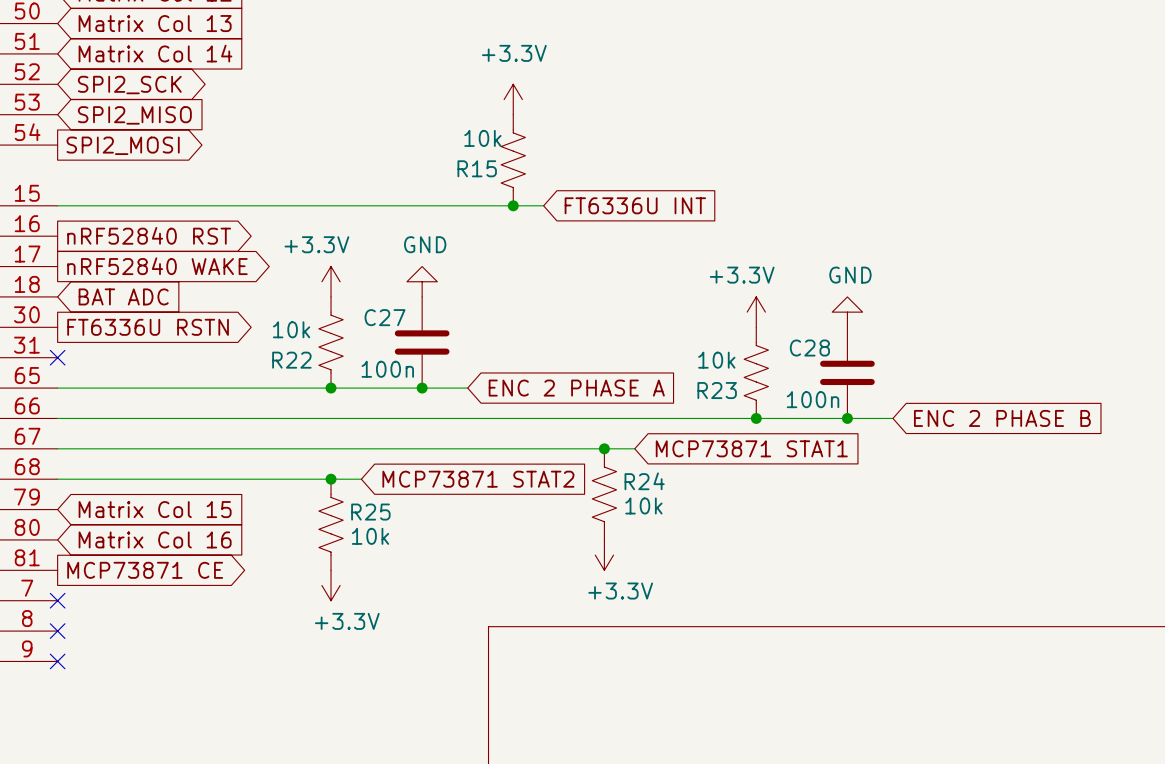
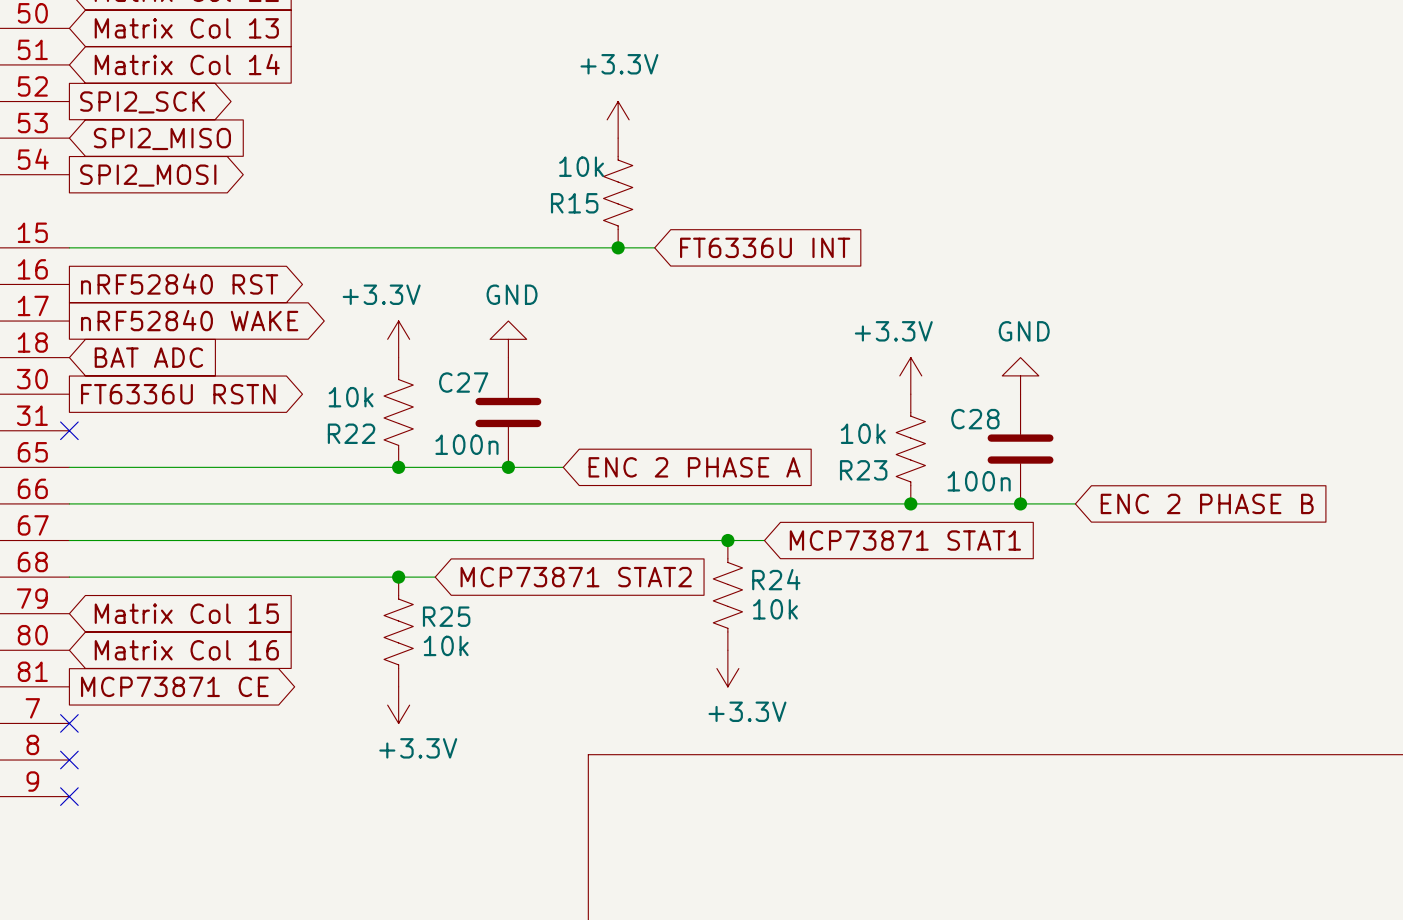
global label shape: bidirectional (129, 85) -> output (142, 102)

